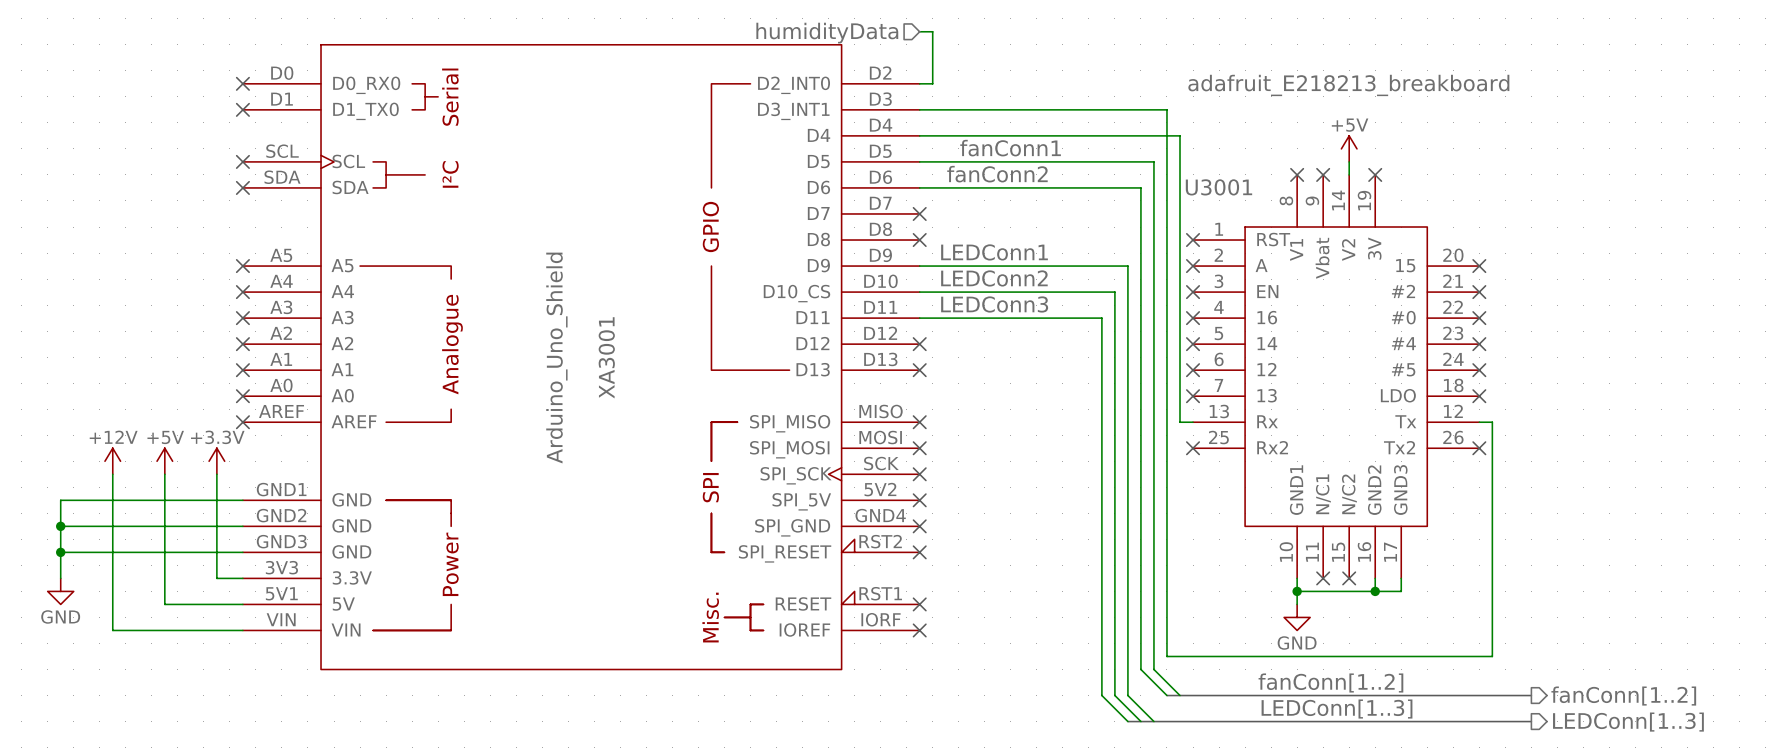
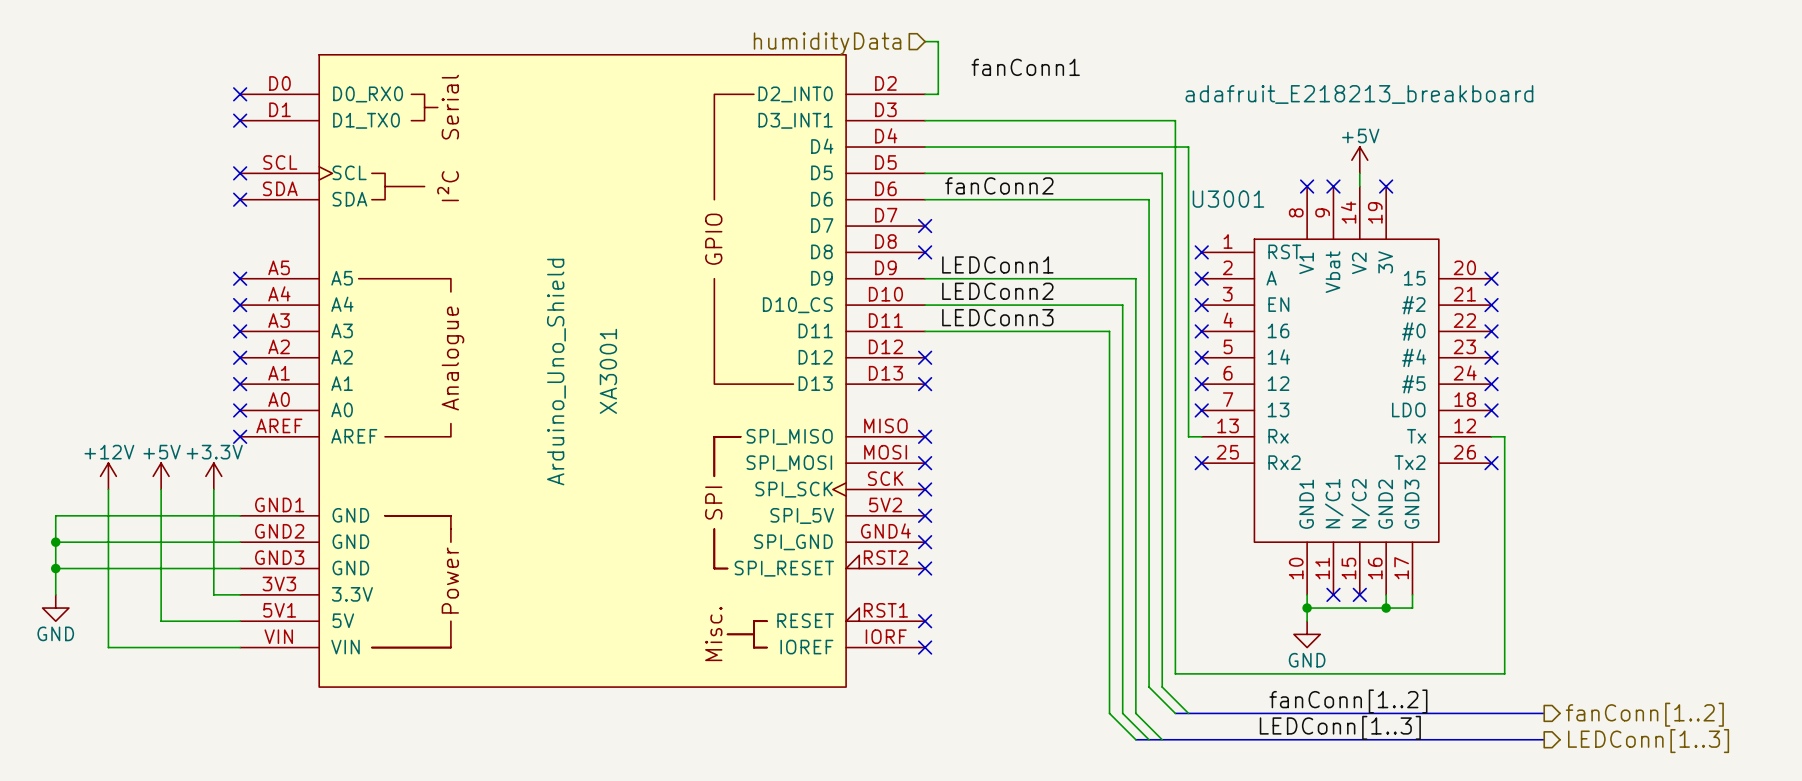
label position: fanConn1 (1010, 148) -> fanConn1 (1025, 67)

